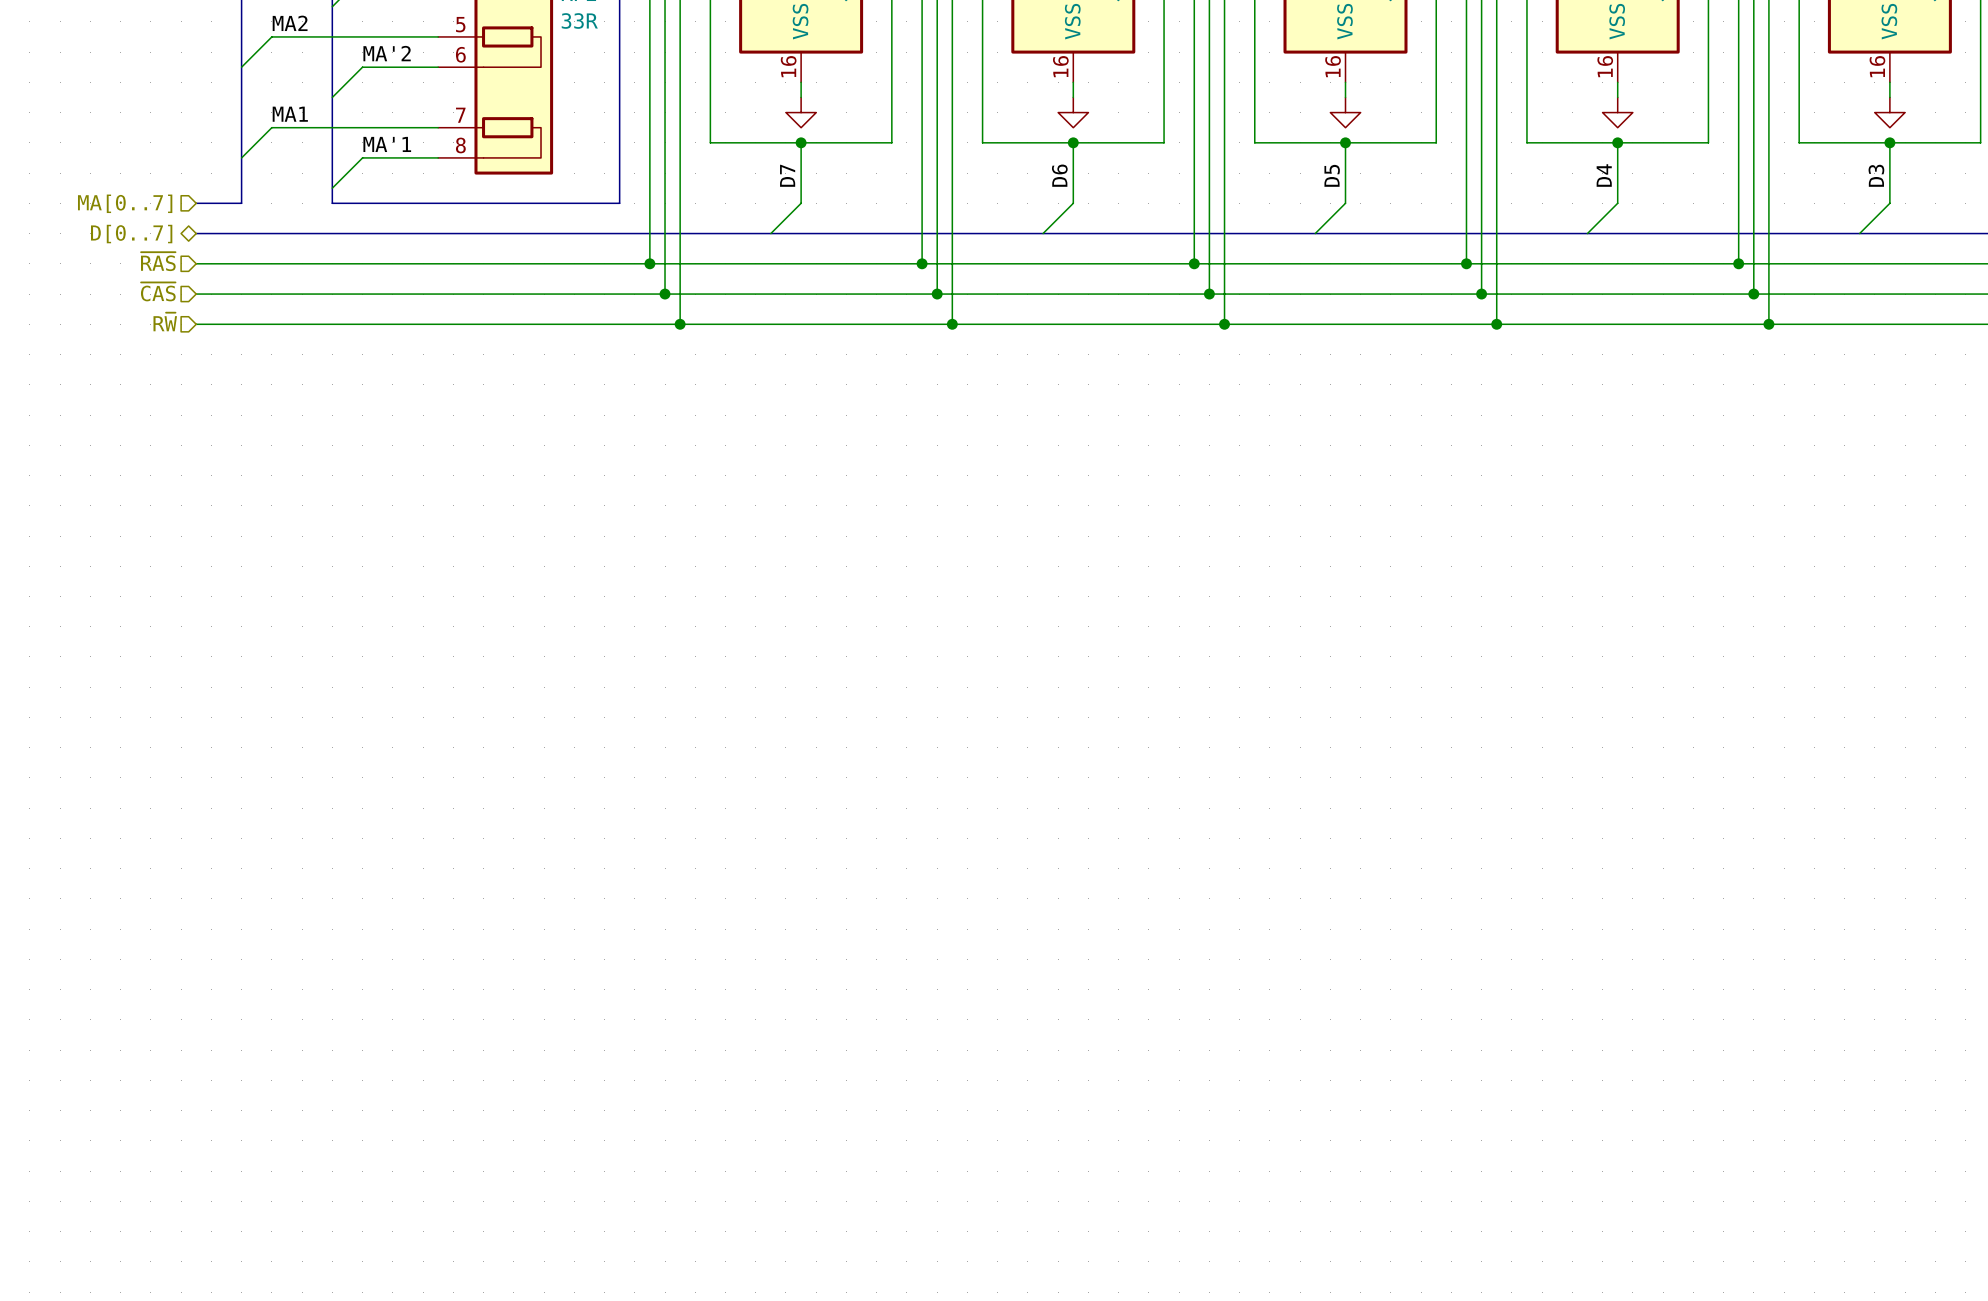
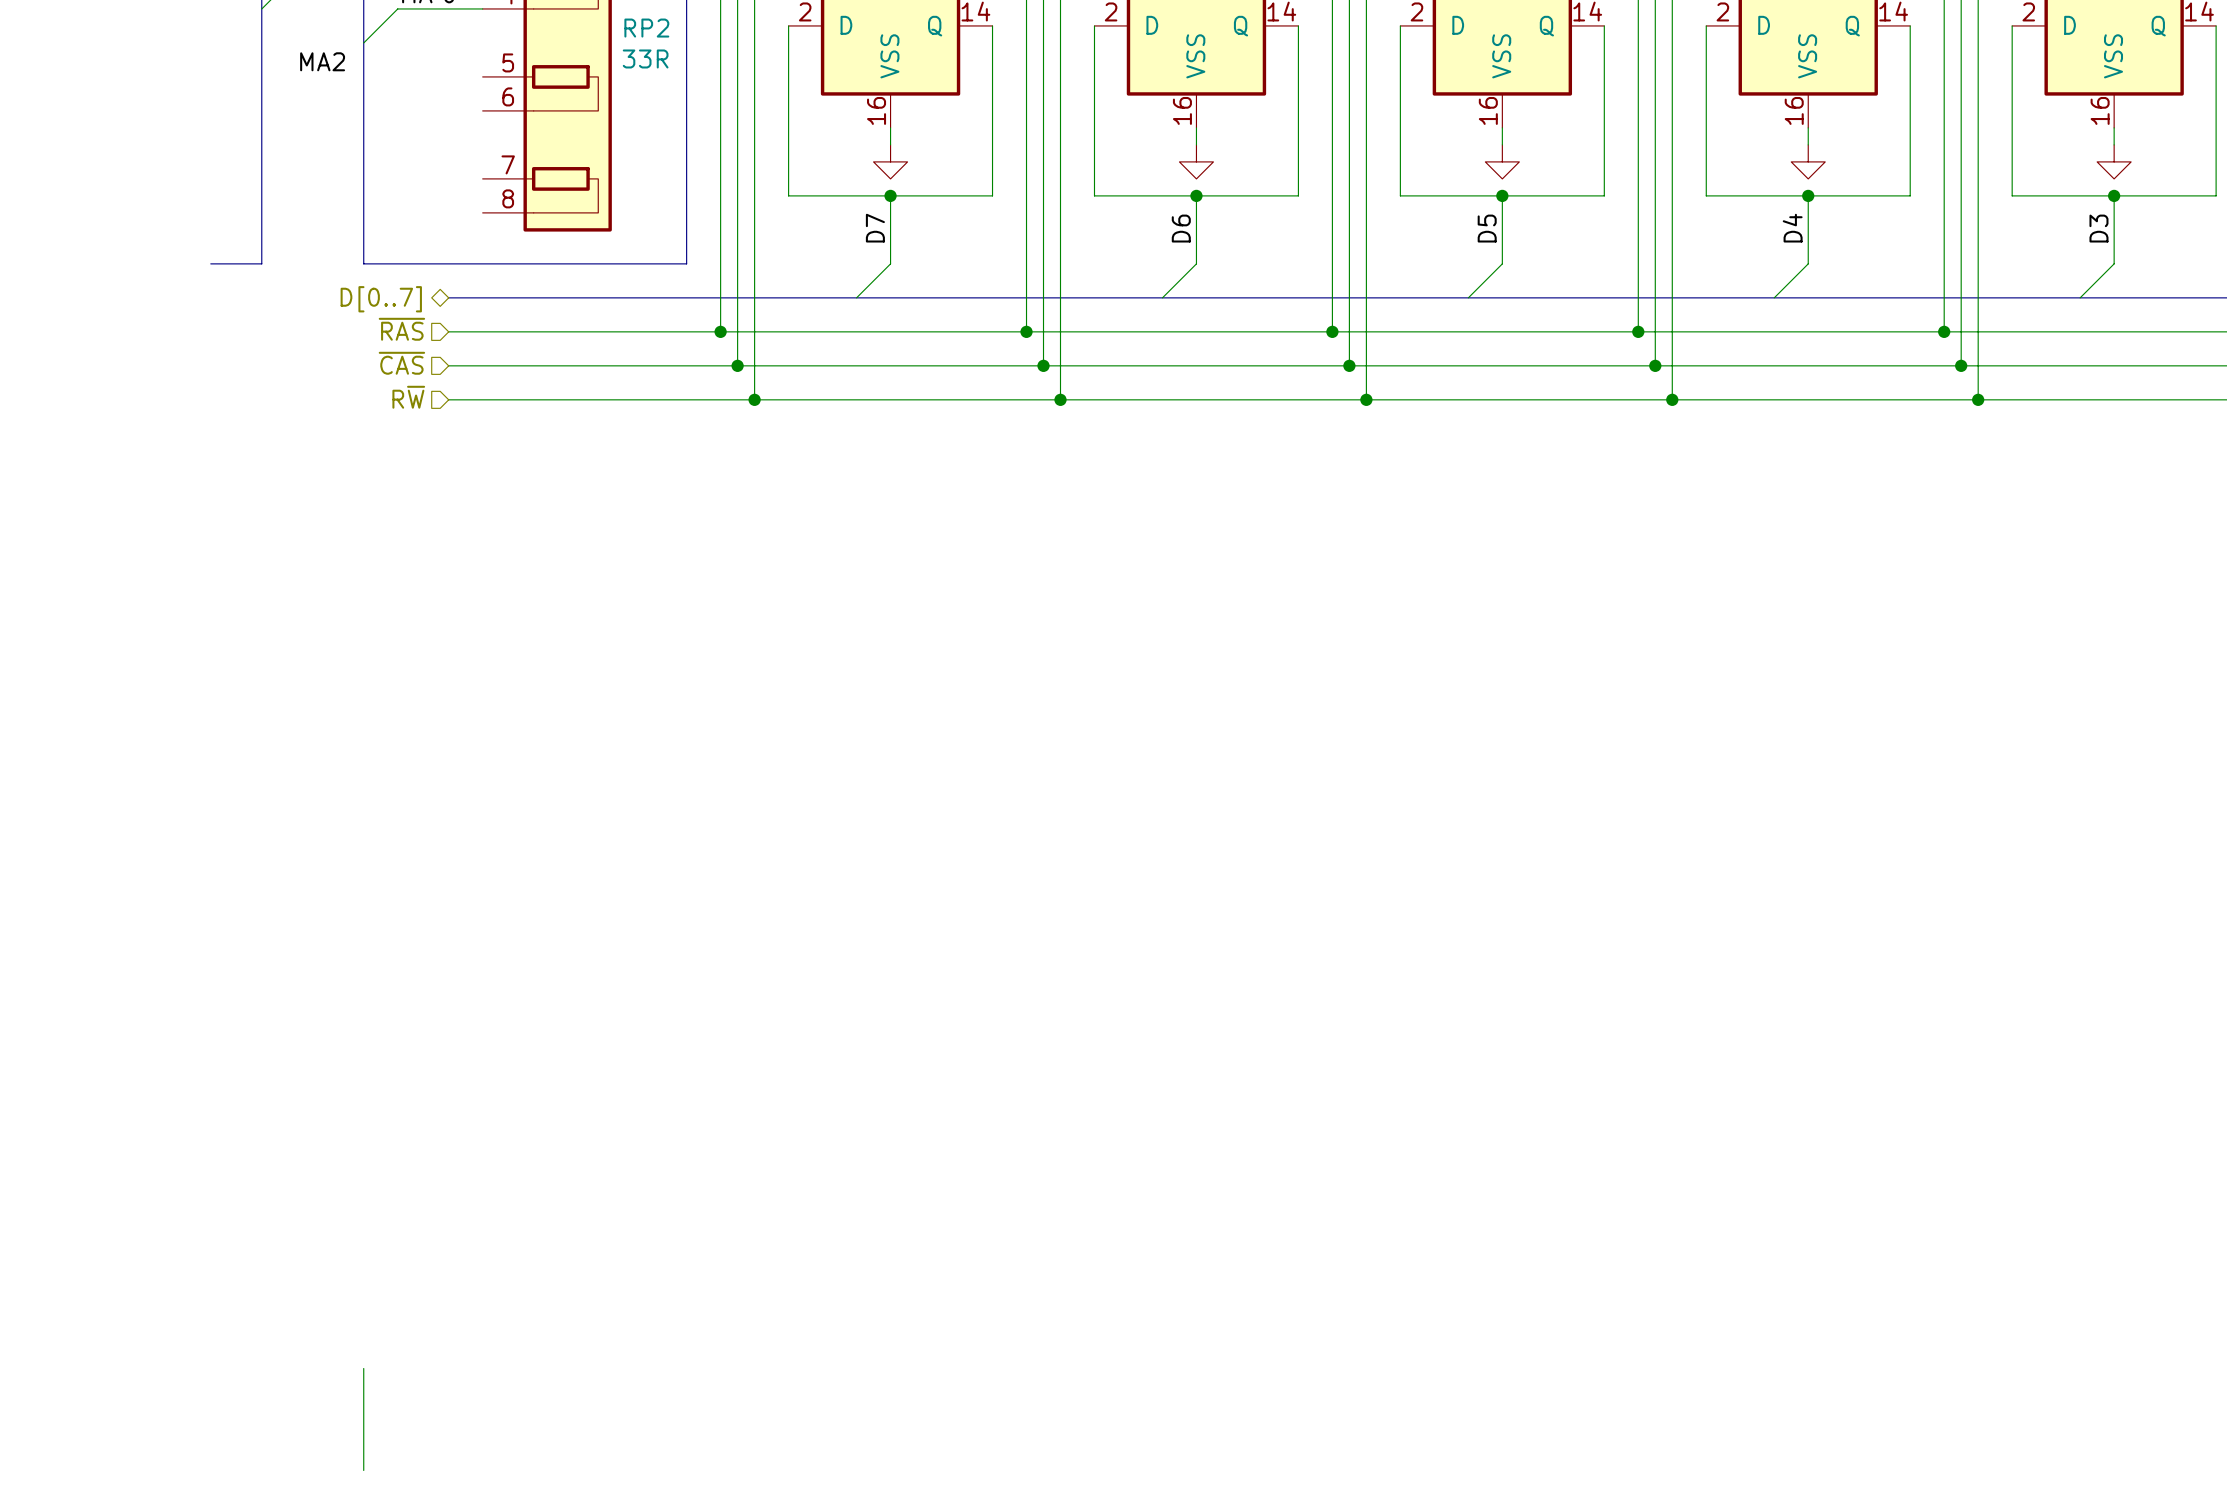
wire: (438, 36) (271, 36) (241, 67) -> none
label: MA'2 (387, 53) -> none
wire: (438, 67) (362, 67) (332, 97) -> none
label: MA1 (290, 114) -> none
wire: (438, 127) (271, 127) (241, 157) -> none
label: MA'1 (387, 144) -> none
wire: (438, 157) (362, 157) (332, 188) -> none
hierarchical label: MA[0..7] (125, 203) -> none
bus: (196, 233) (407, 233) -> none
hierarchical label position: D[0..7] (131, 234) -> D[0..7] (381, 299)
hierarchical label position: ~{RAS} (158, 261) -> ~{RAS} (401, 329)
wire: (196, 263) (407, 263) -> none
hierarchical label position: ~{CAS} (158, 291) -> ~{CAS} (401, 363)
wire: (196, 294) (407, 294) -> none
hierarchical label position: R~{W} (165, 321) -> R~{W} (408, 397)
wire: (196, 324) (407, 324) -> none
wire: none -> (363, 1368) (363, 1470)

